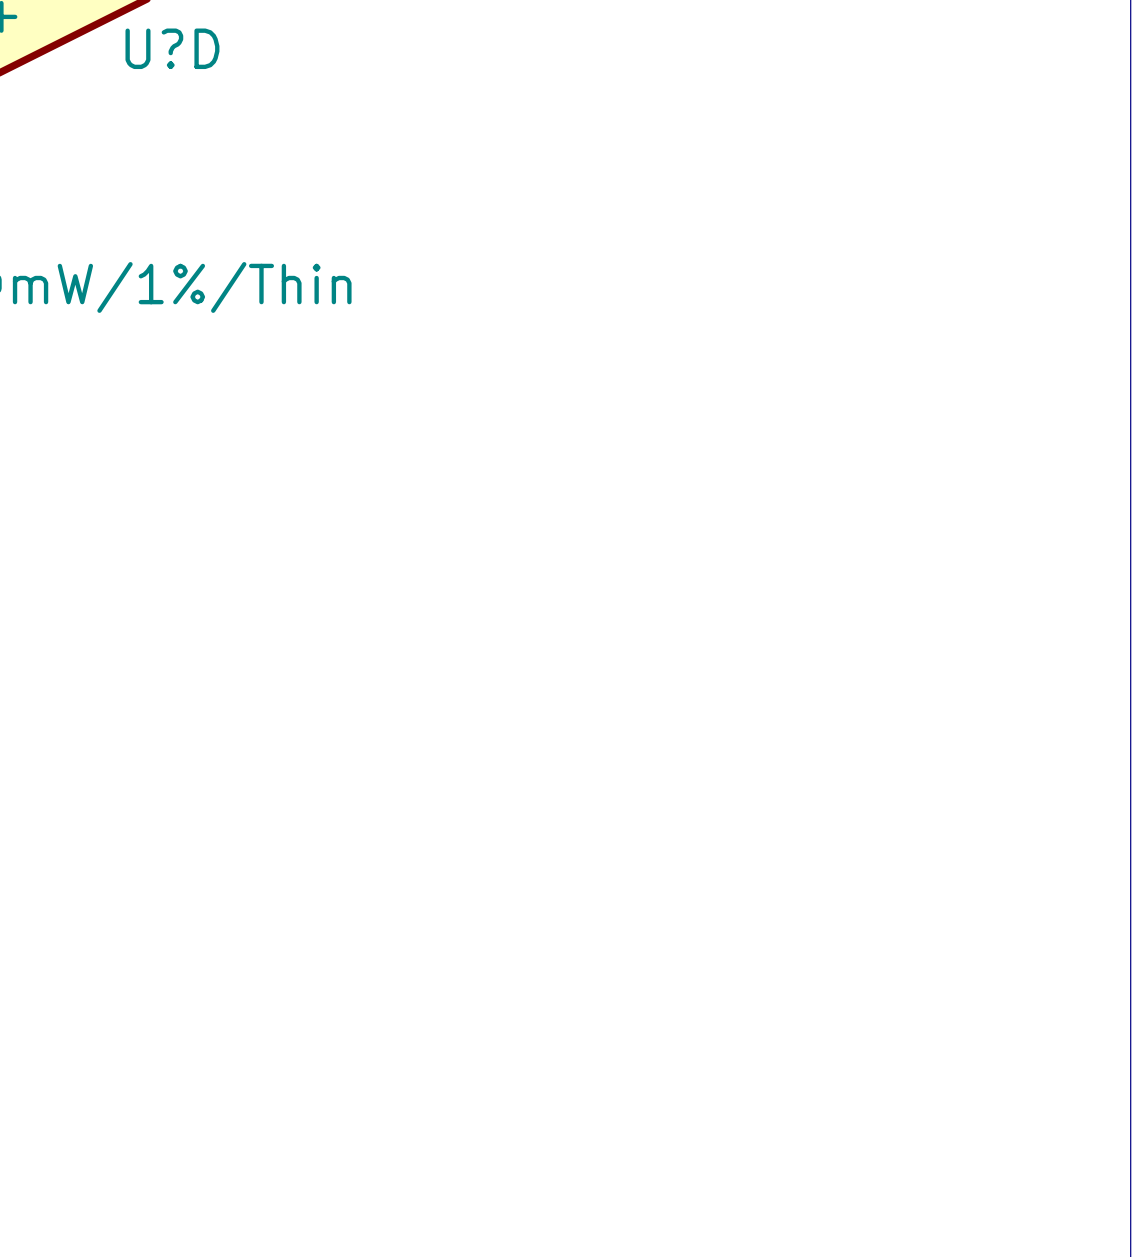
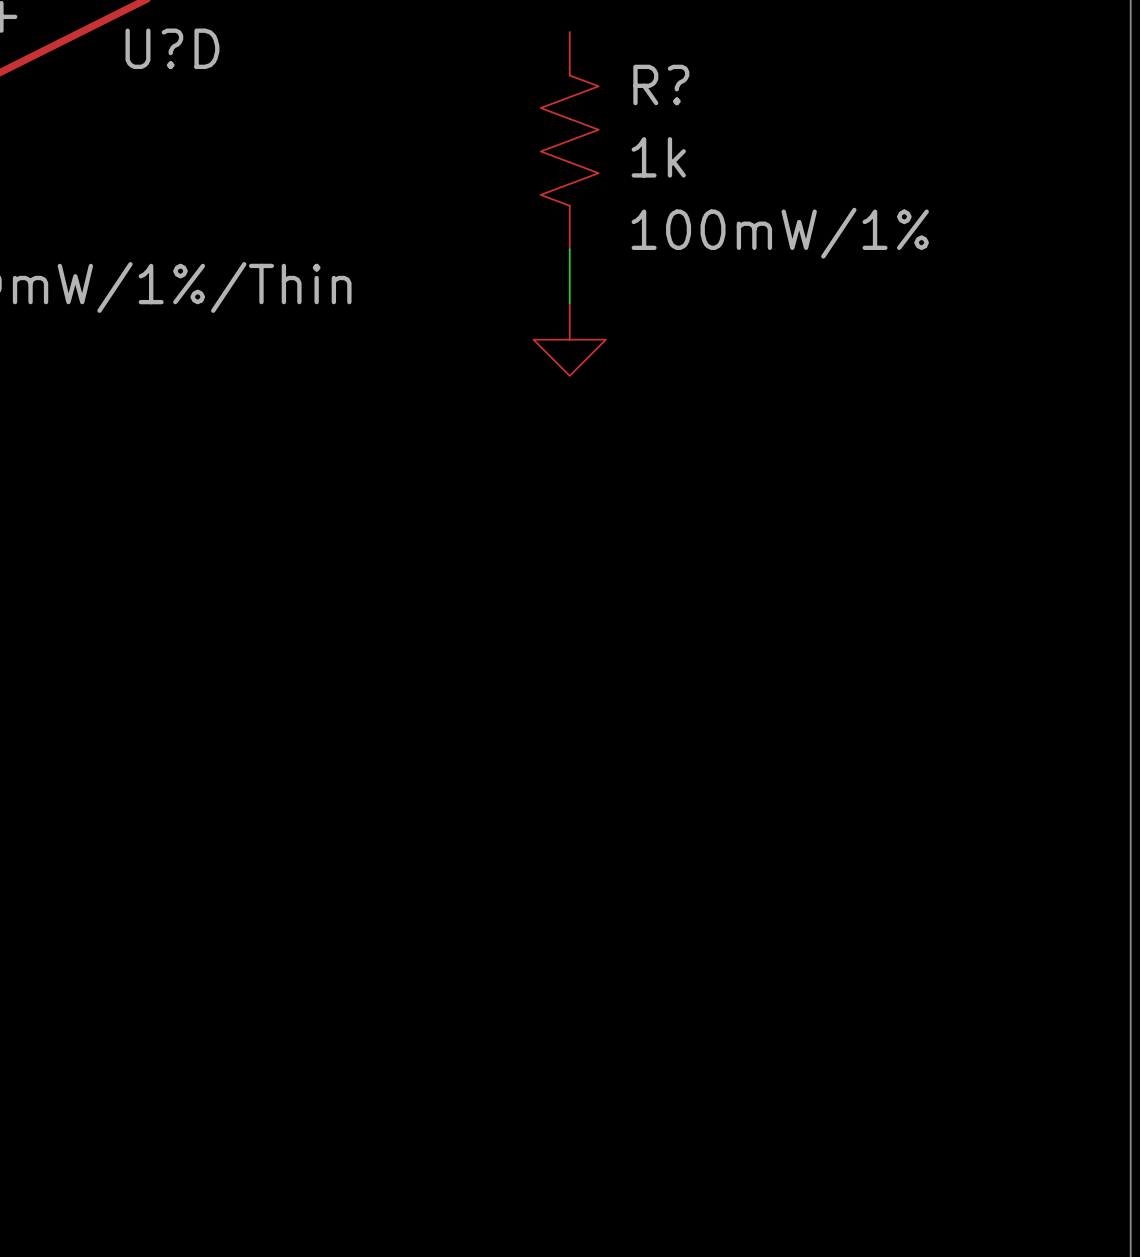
R?: none -> 1k (569, 140)
wire: none -> (569, 249) (569, 303)
power symbol: none -> (569, 339)

